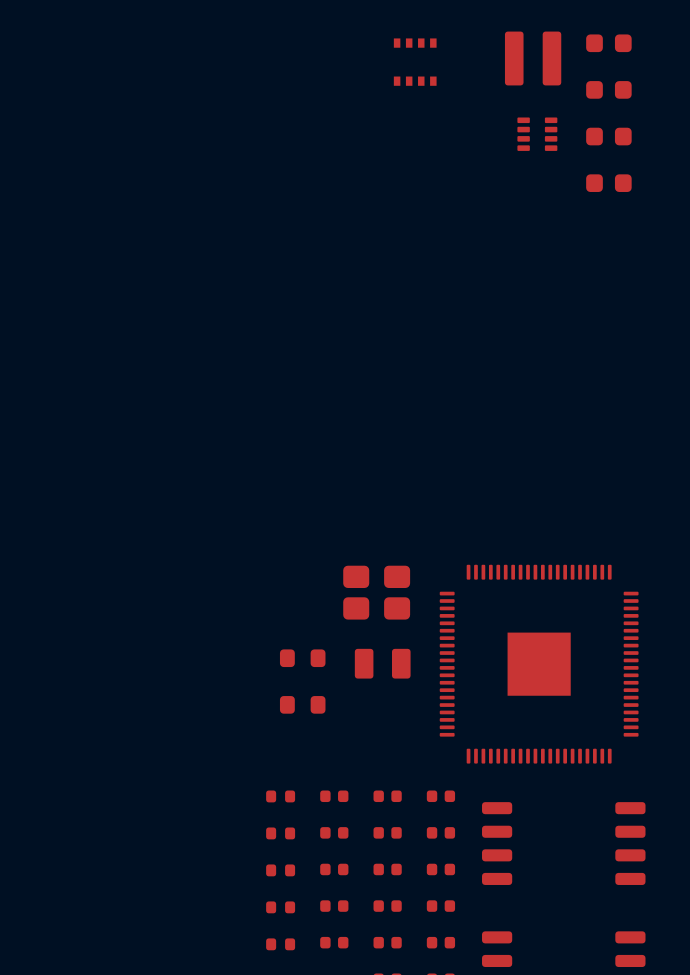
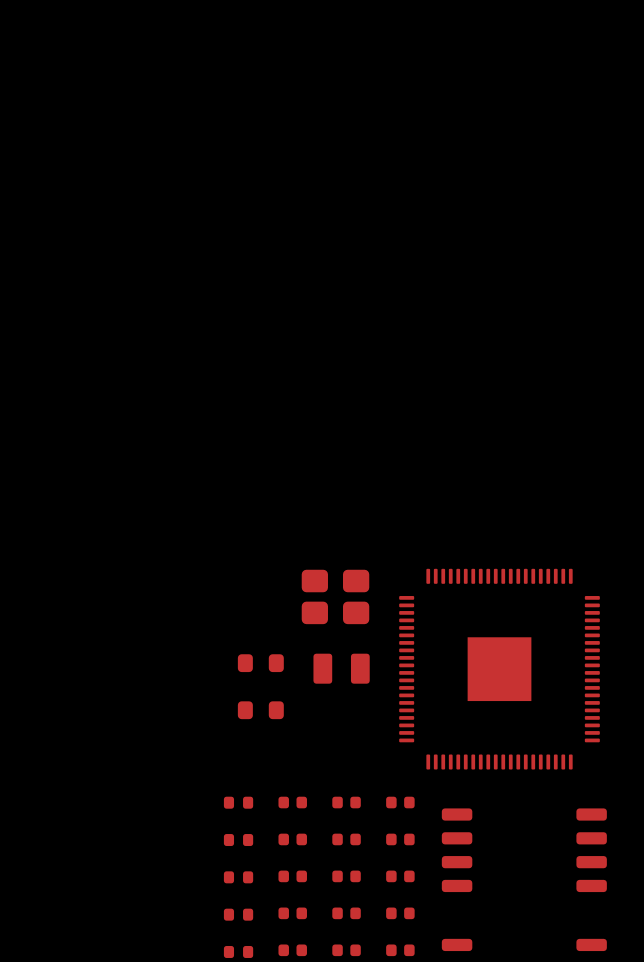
part: (608, 43) -> none
part: (533, 58) -> none
part: (415, 62) -> none
part: (608, 89) -> none
part: (537, 134) -> none
part: (608, 136) -> none
part: (608, 183) -> none

